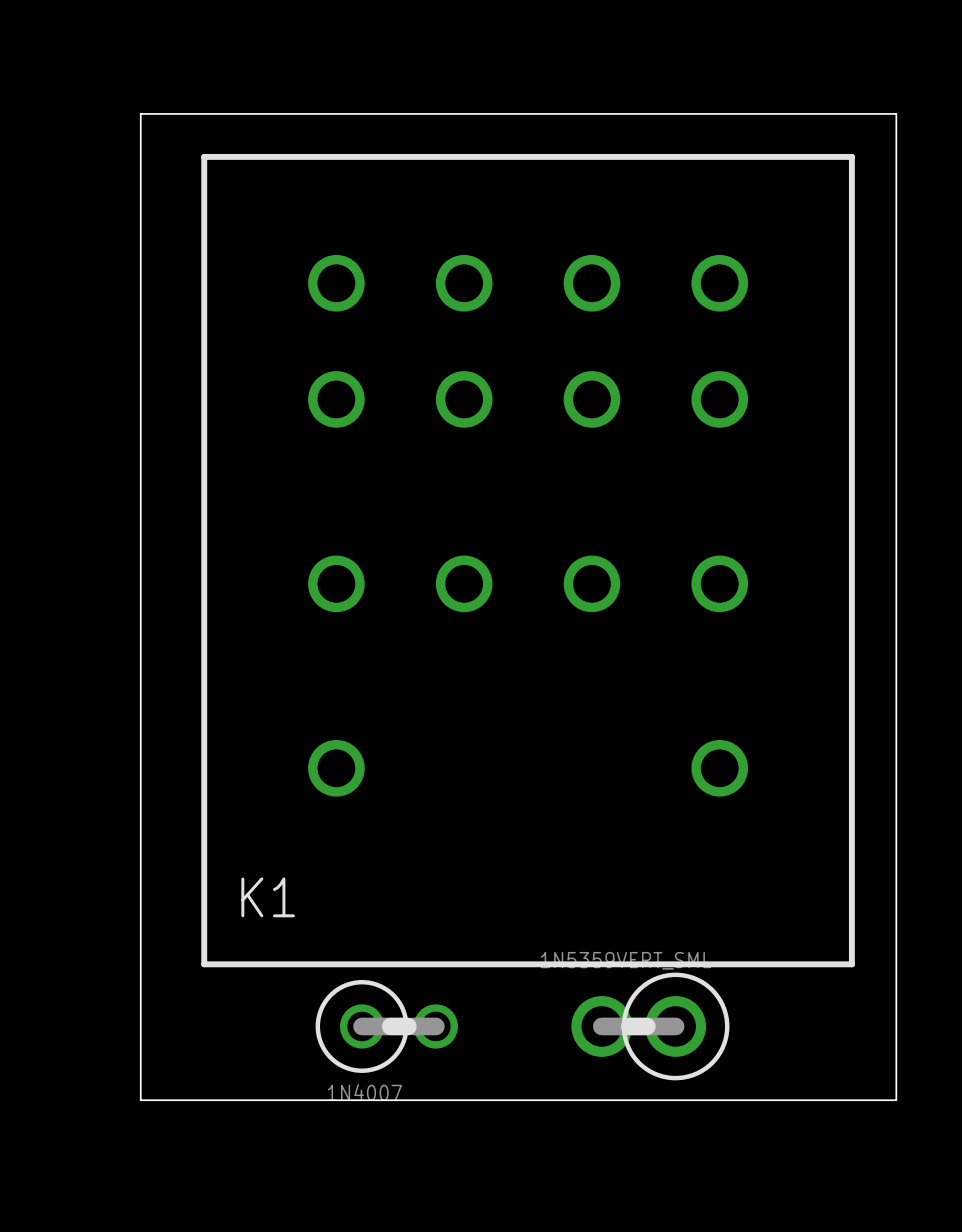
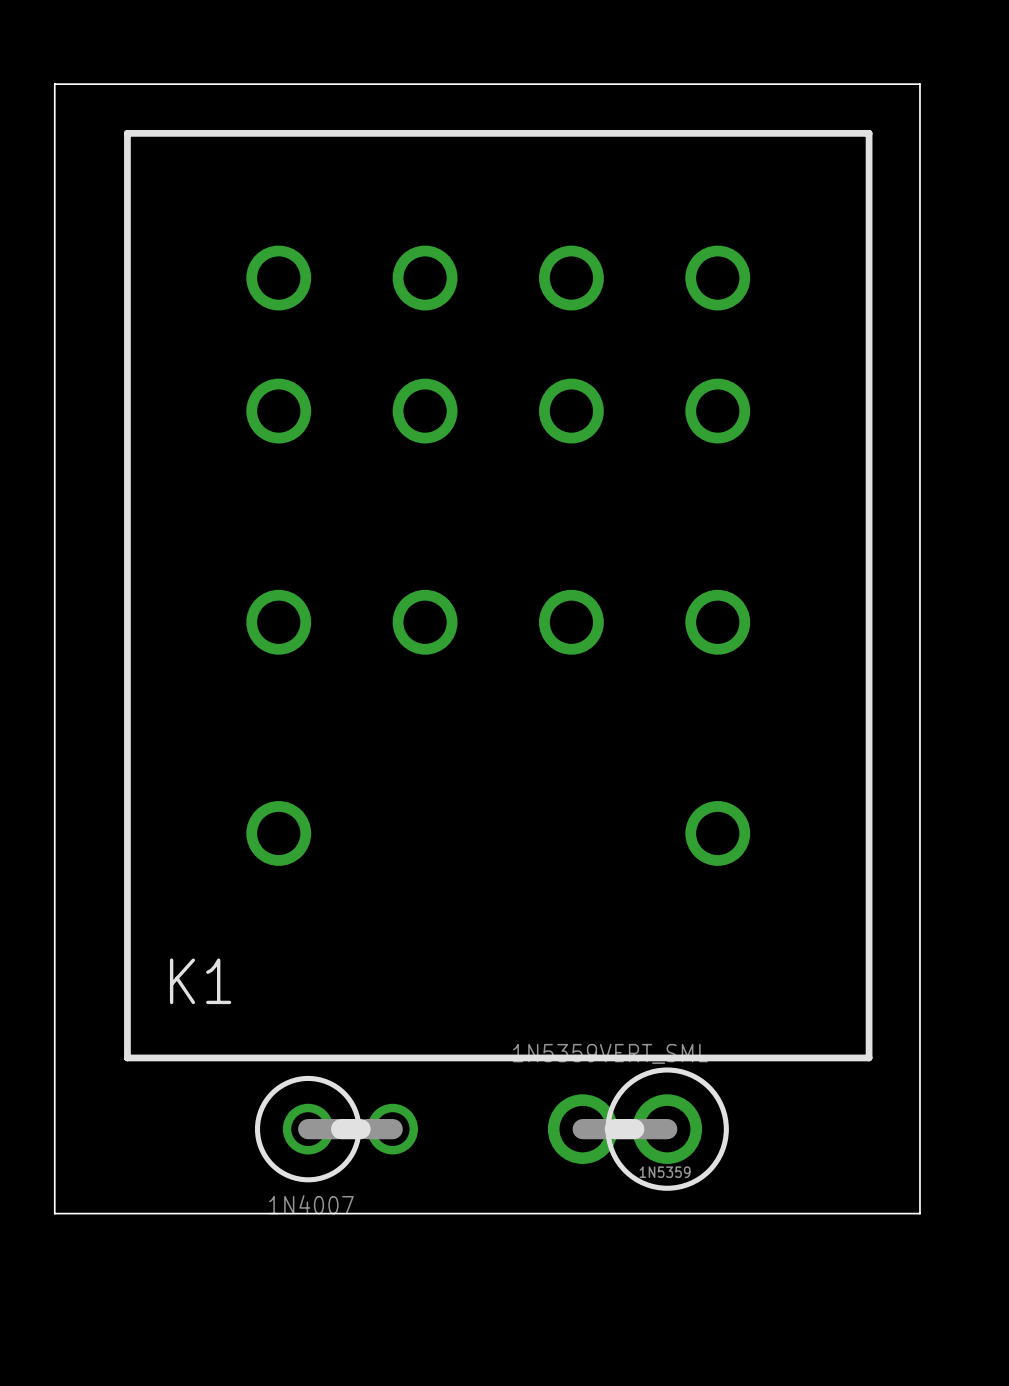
part text: none -> 1N5359 (665, 1172)

